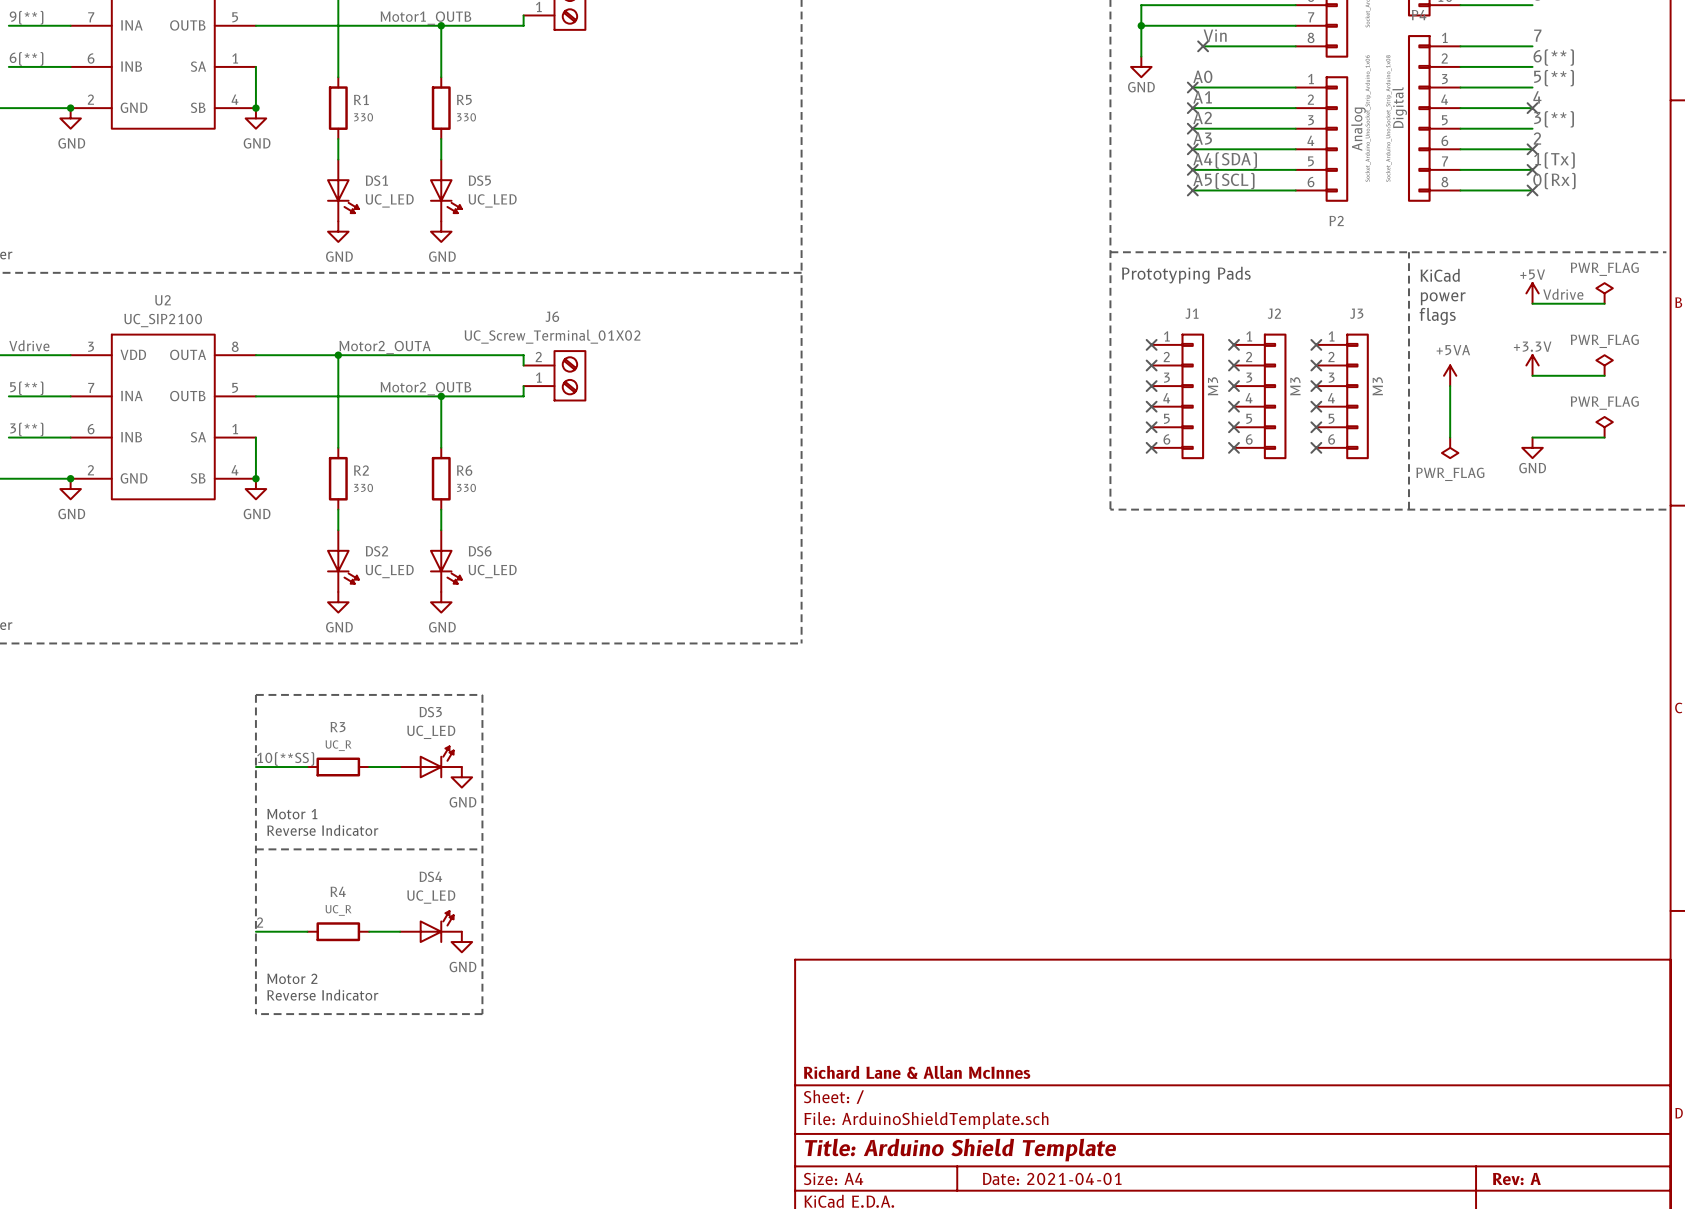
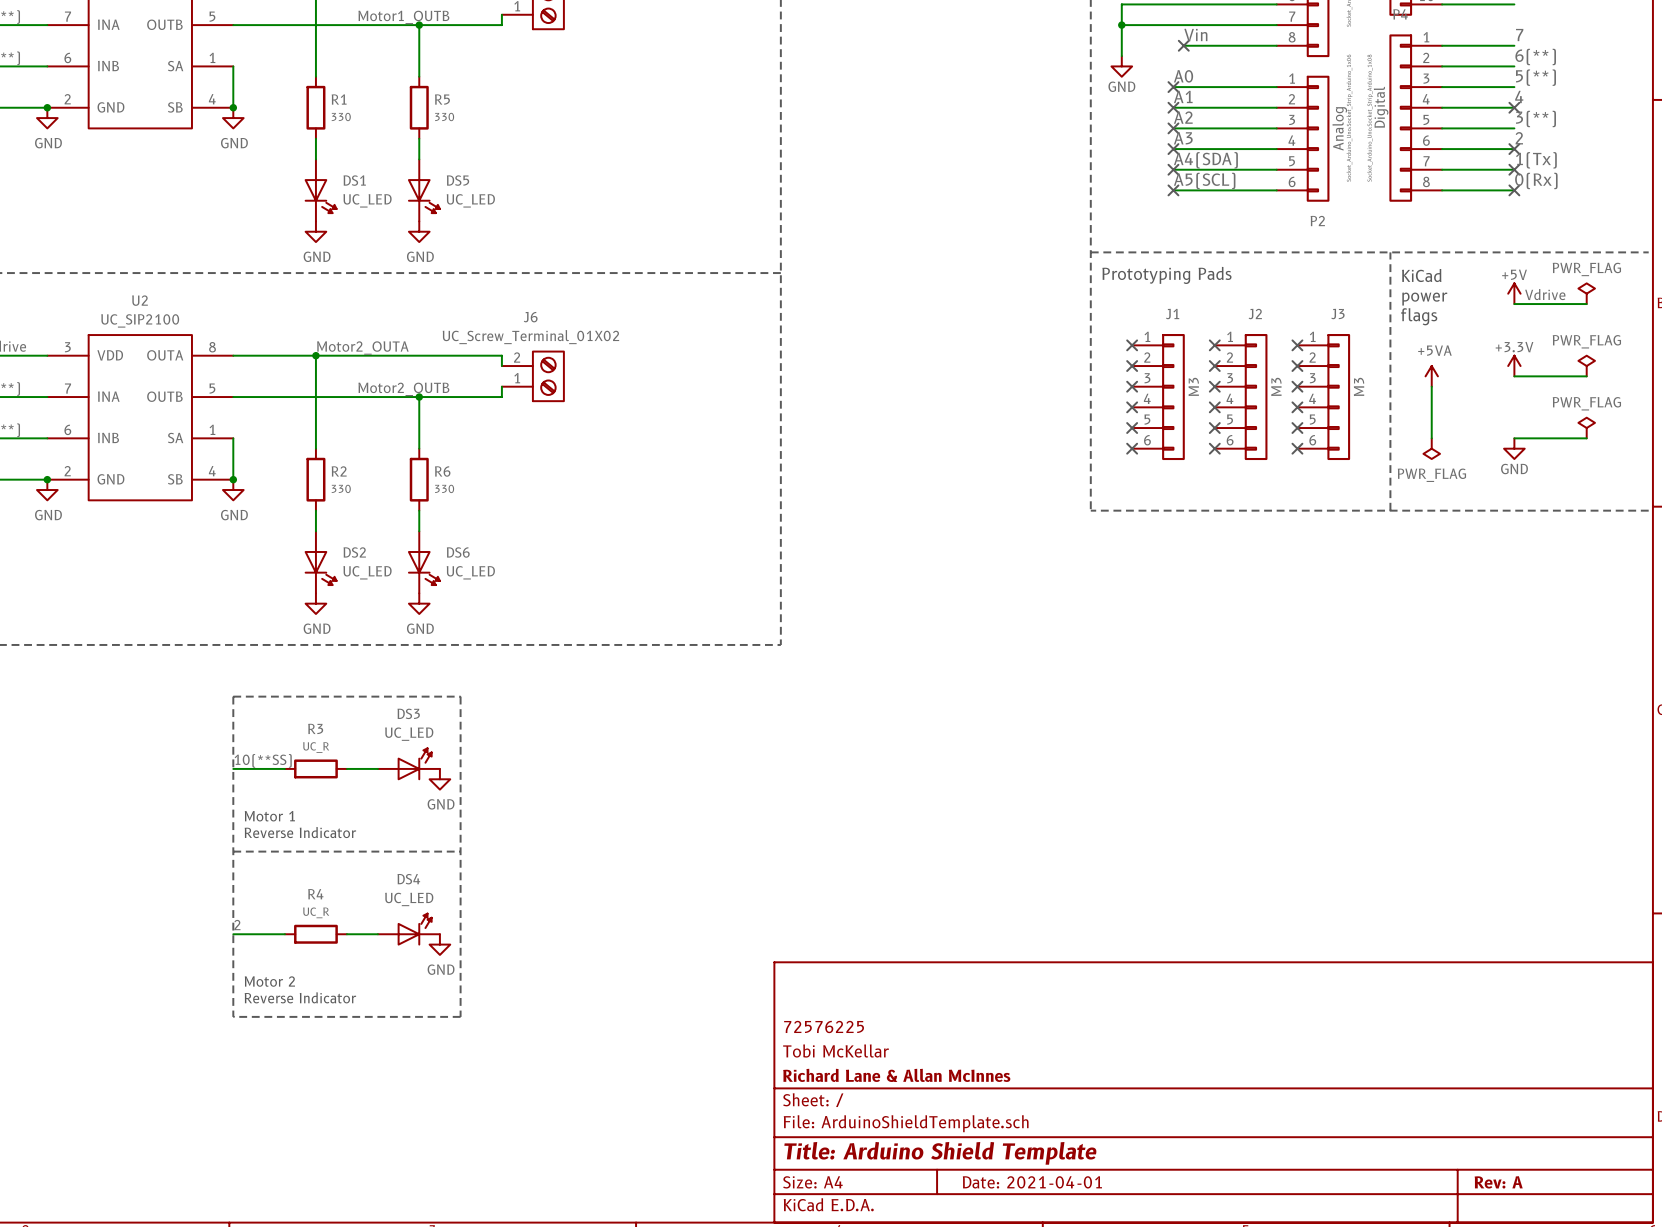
title block: none -> 72576225 (824, 1027)
title block: none -> Tobi McKellar (836, 1050)

